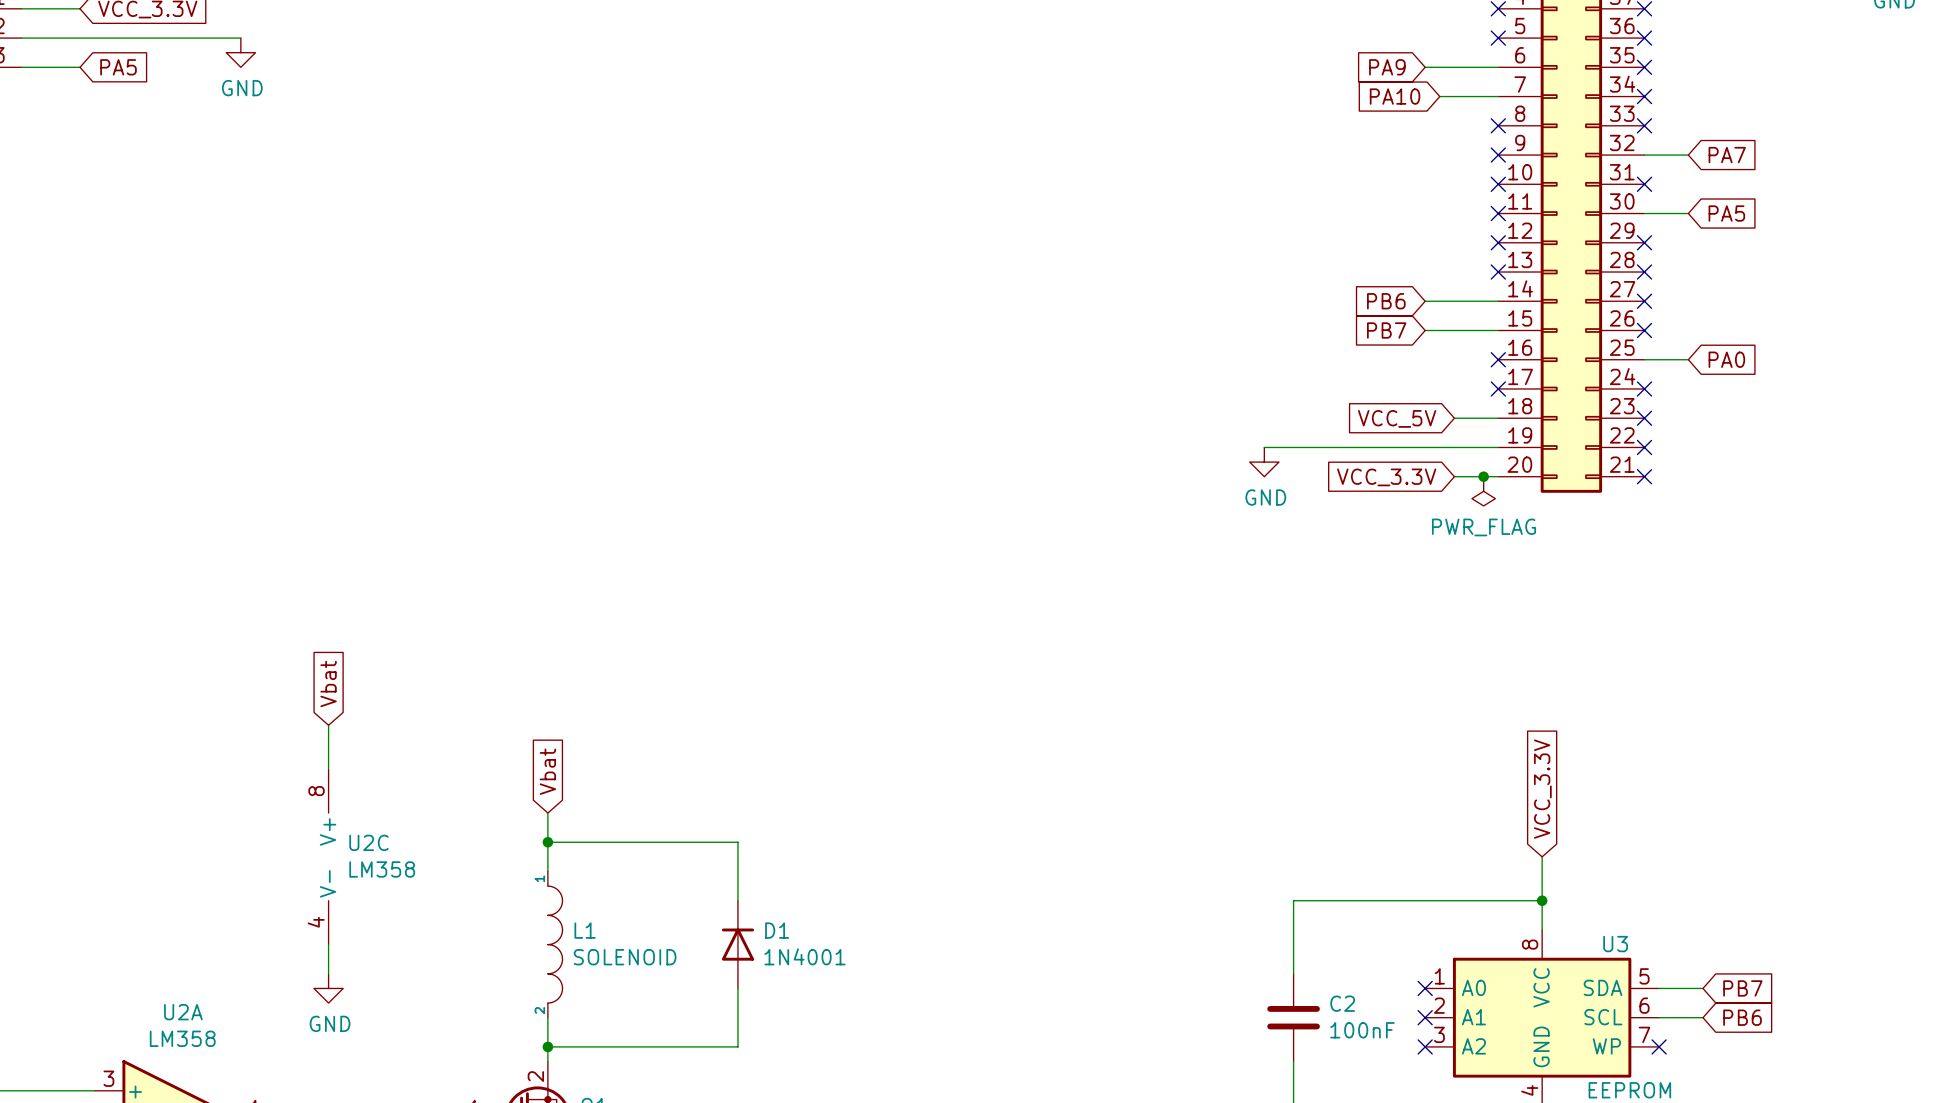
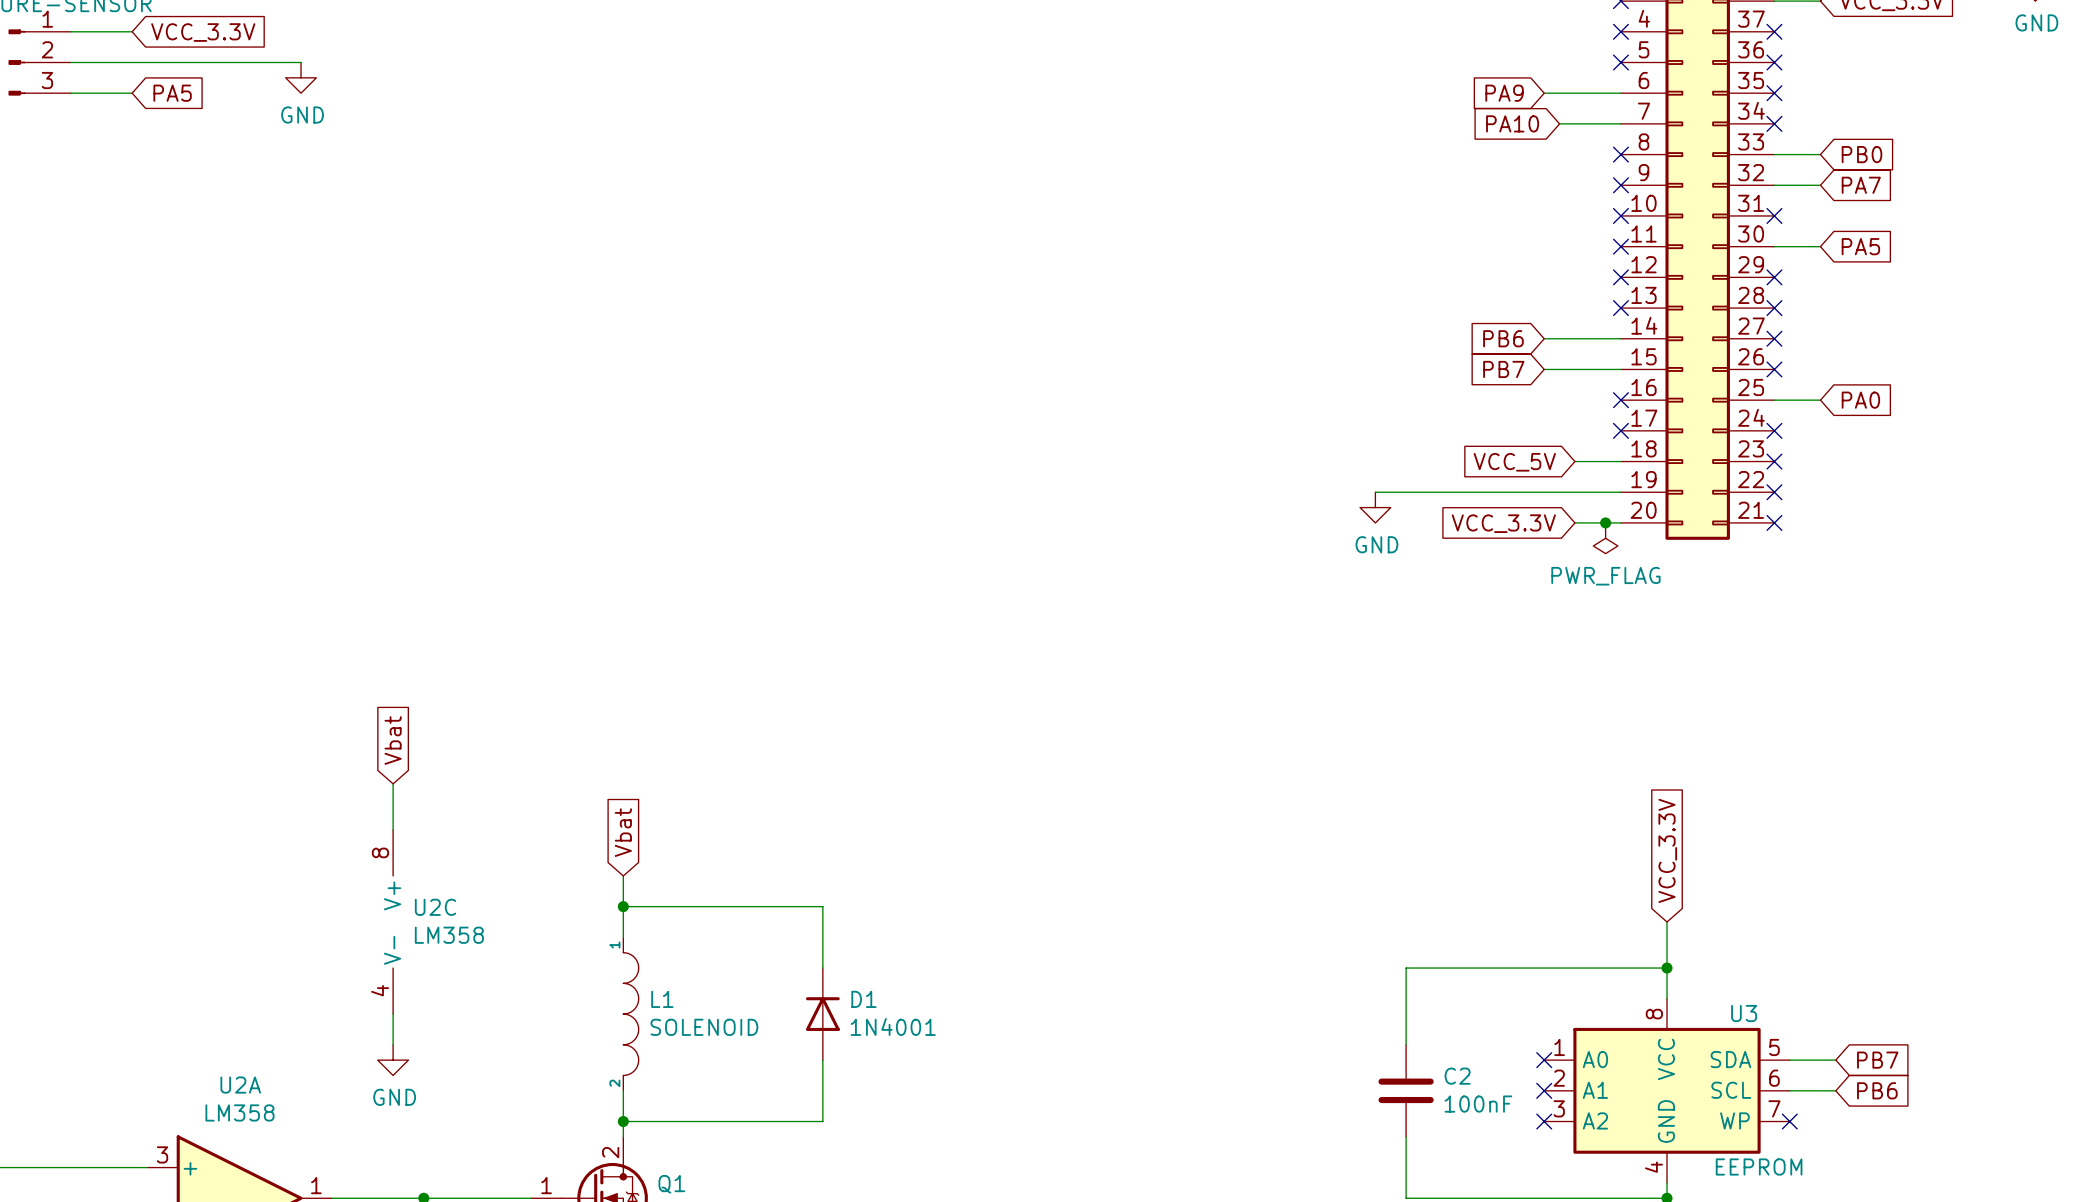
wire: none -> (1774, 154) (1820, 154)
no-connect mark: (1644, 125) -> none
global label: none -> PB0 (1861, 154)

